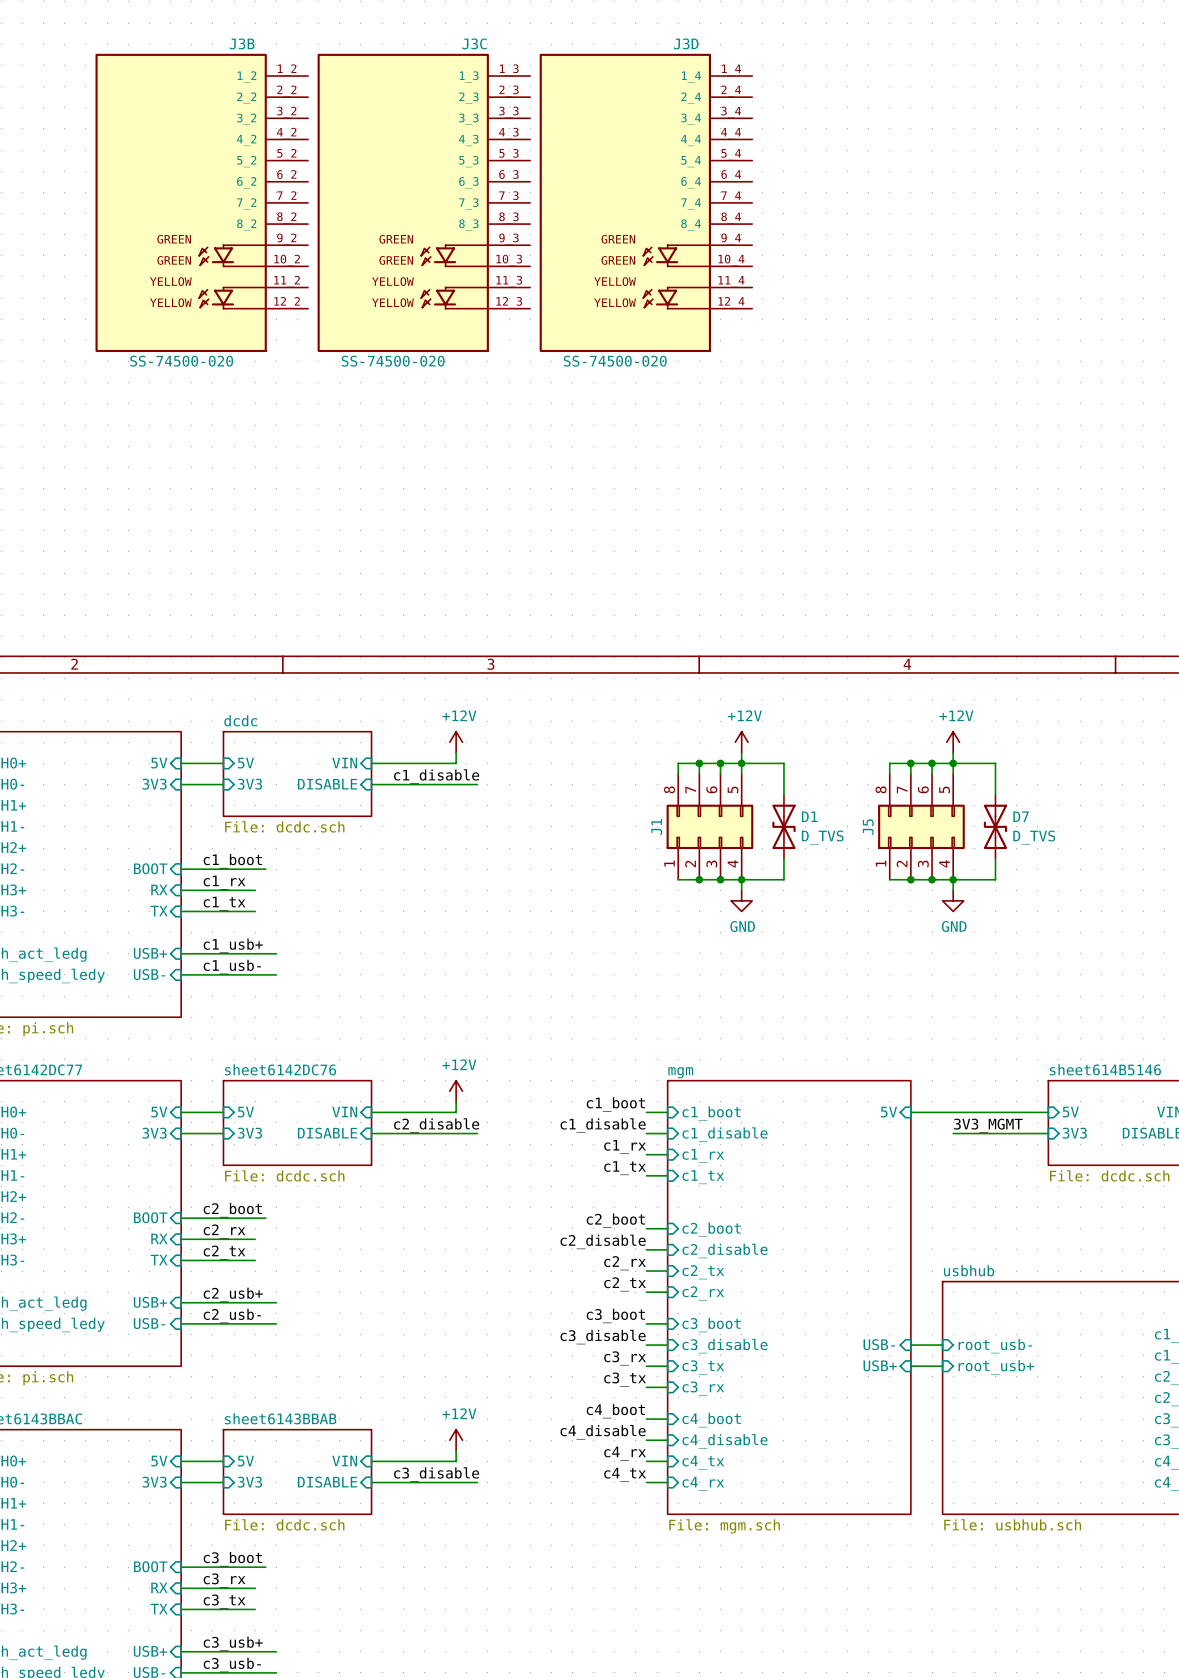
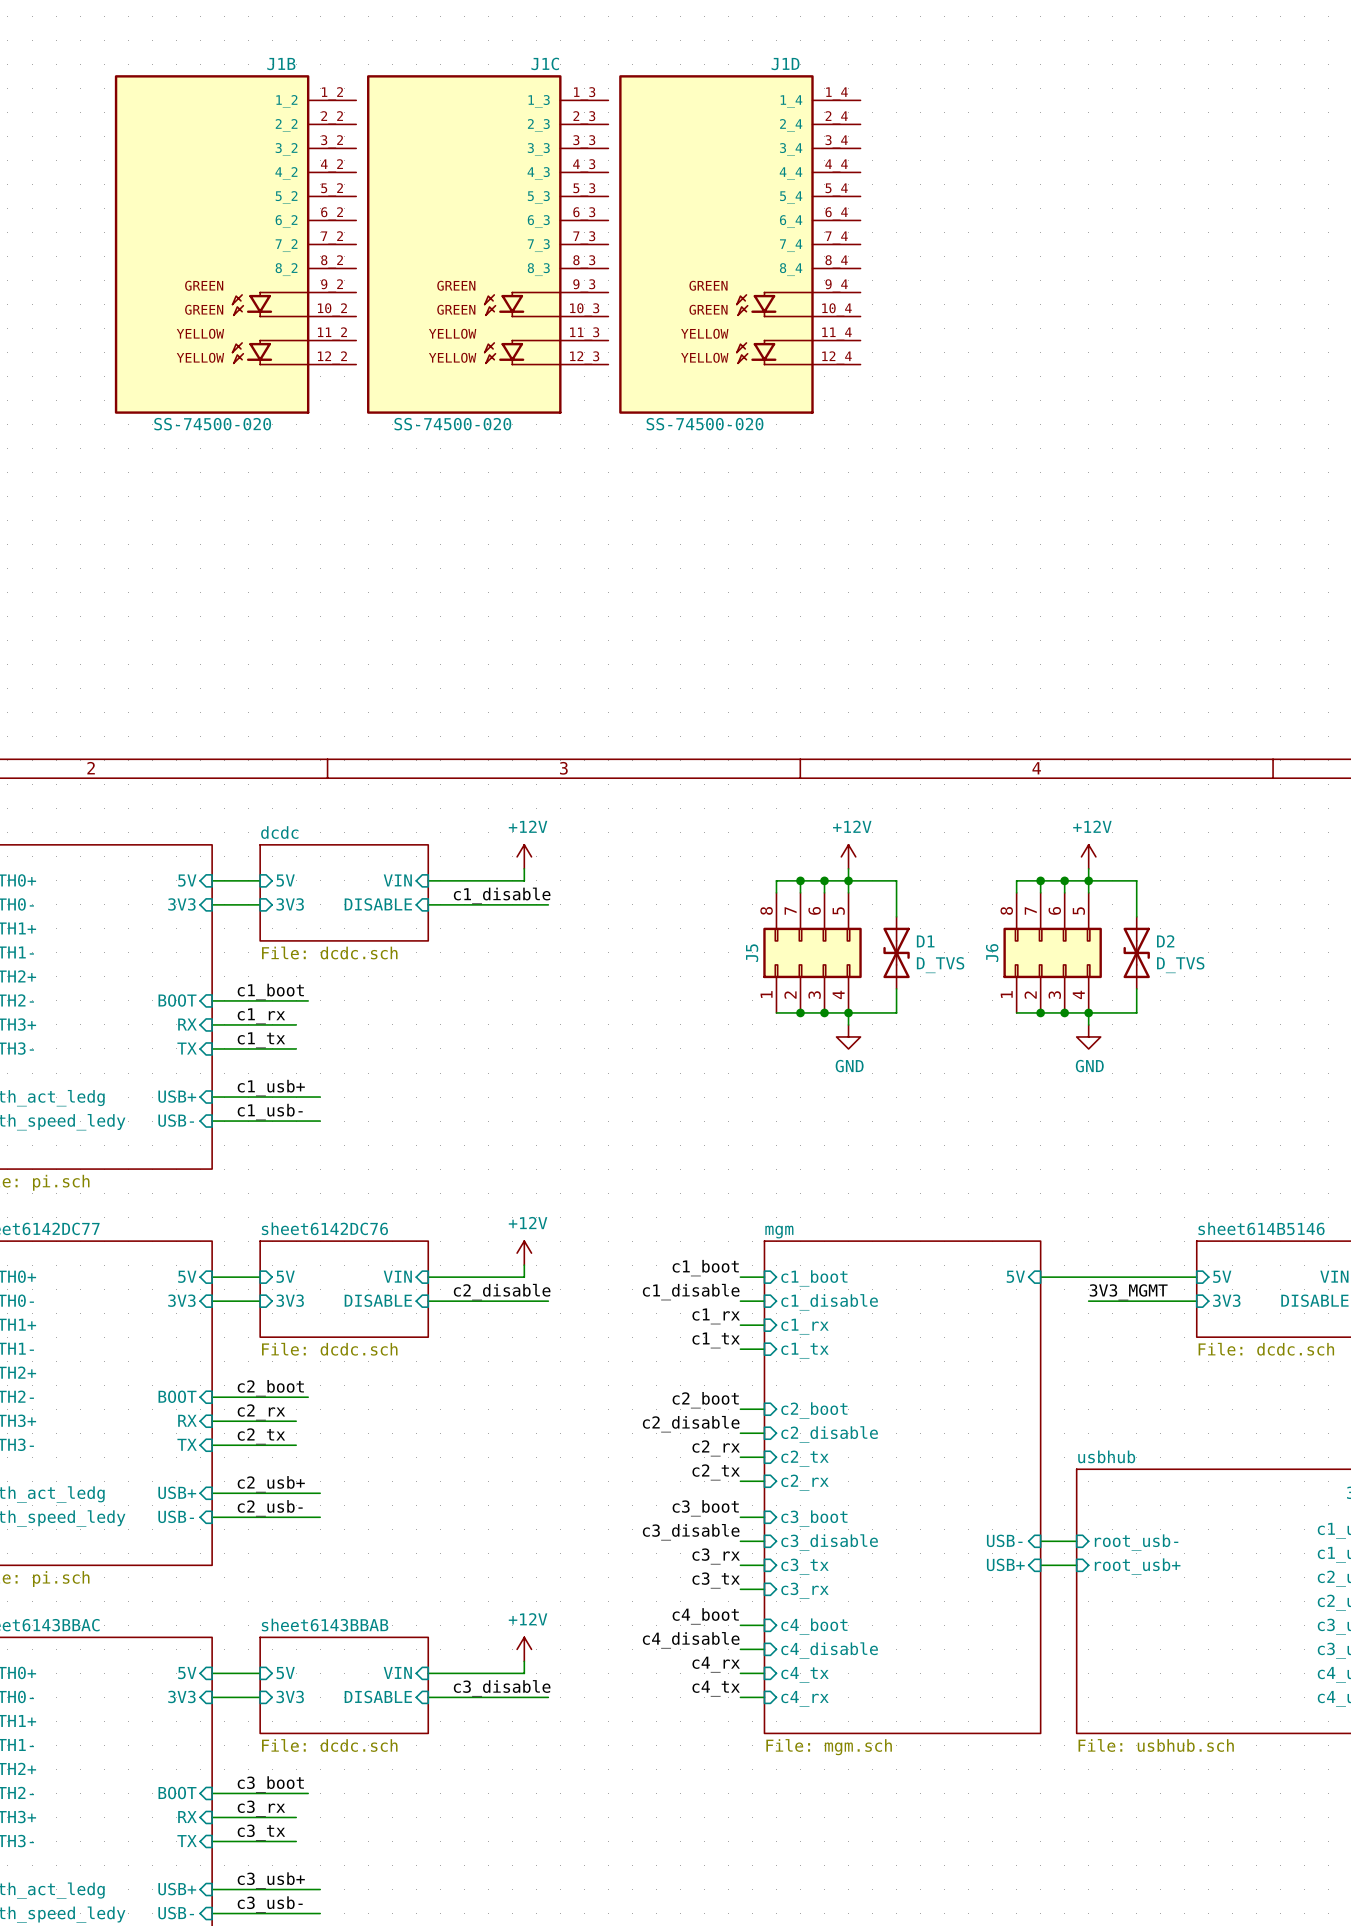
J3B name: J3B (242, 43) -> J1B (281, 64)
J3C name: J3C (474, 43) -> J1C (545, 63)
J3D name: J3D (686, 43) -> J1D (785, 64)
D7 name: D7 (1021, 816) -> D2 (1165, 941)
J1 name: J1 (656, 826) -> J5 (752, 953)
J5 name: J5 (868, 827) -> J6 (992, 953)

